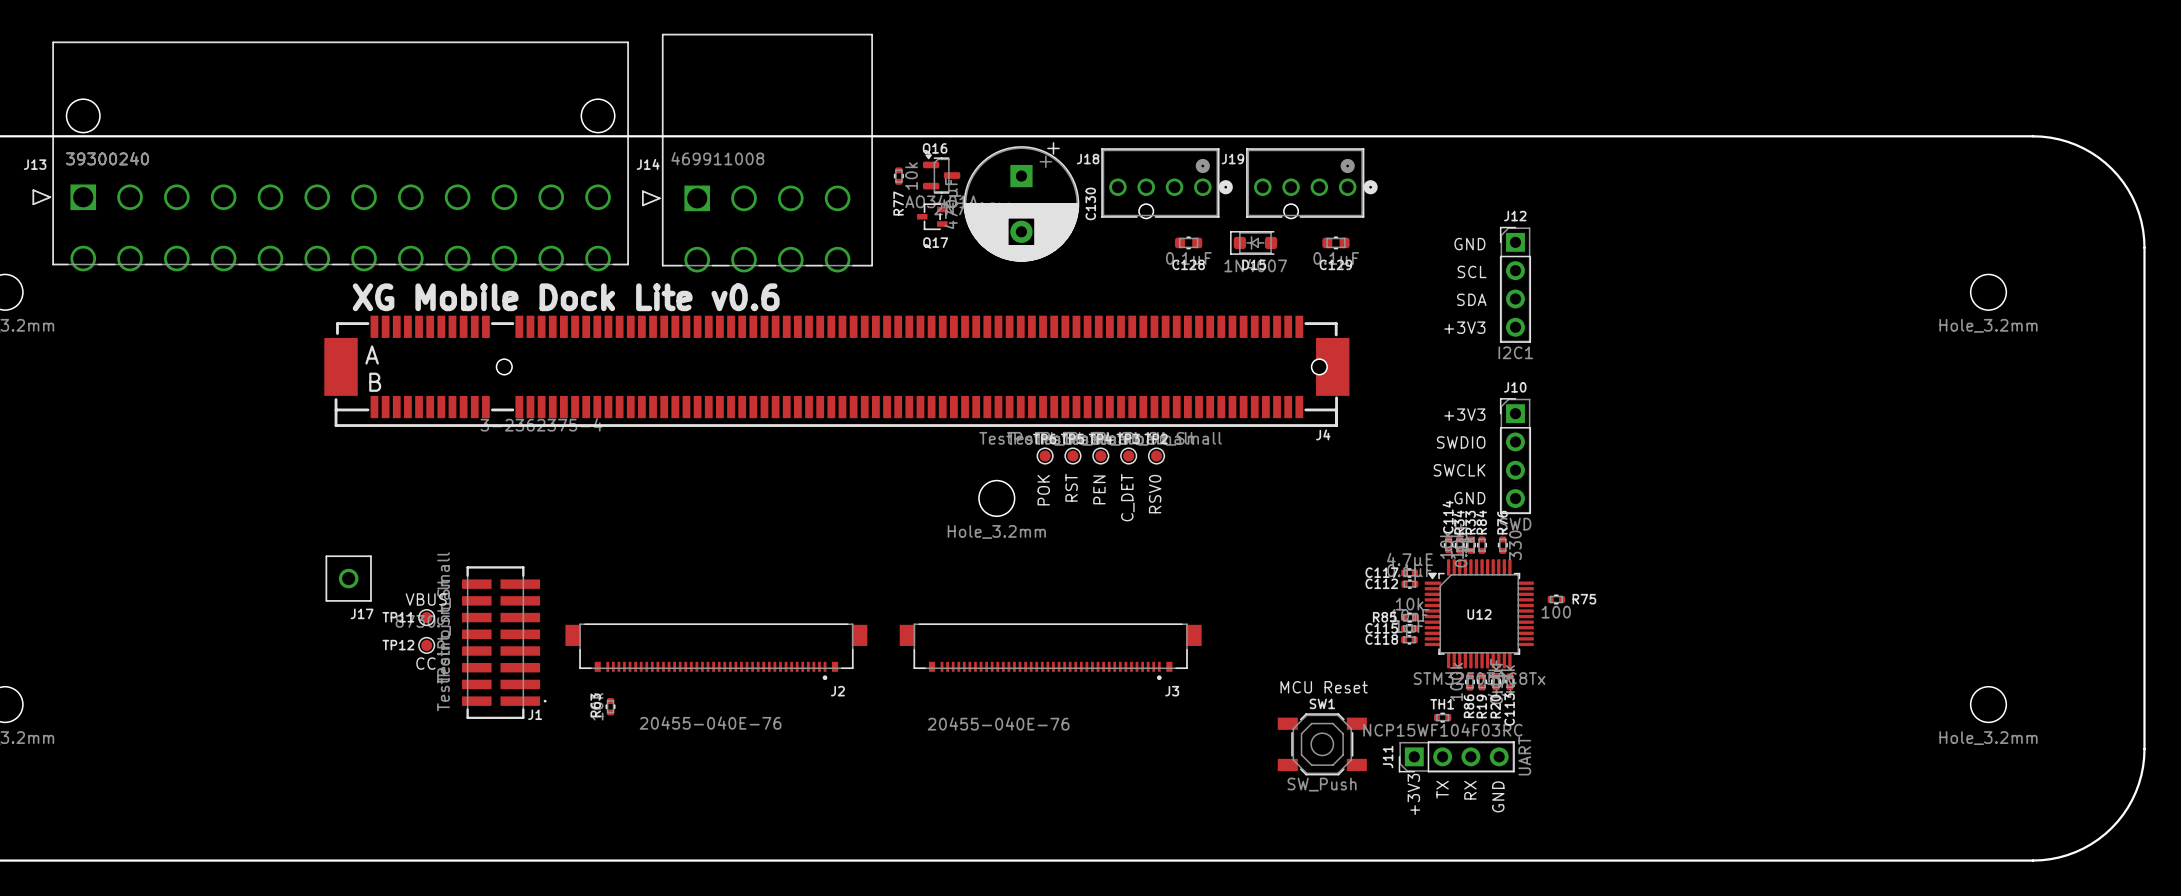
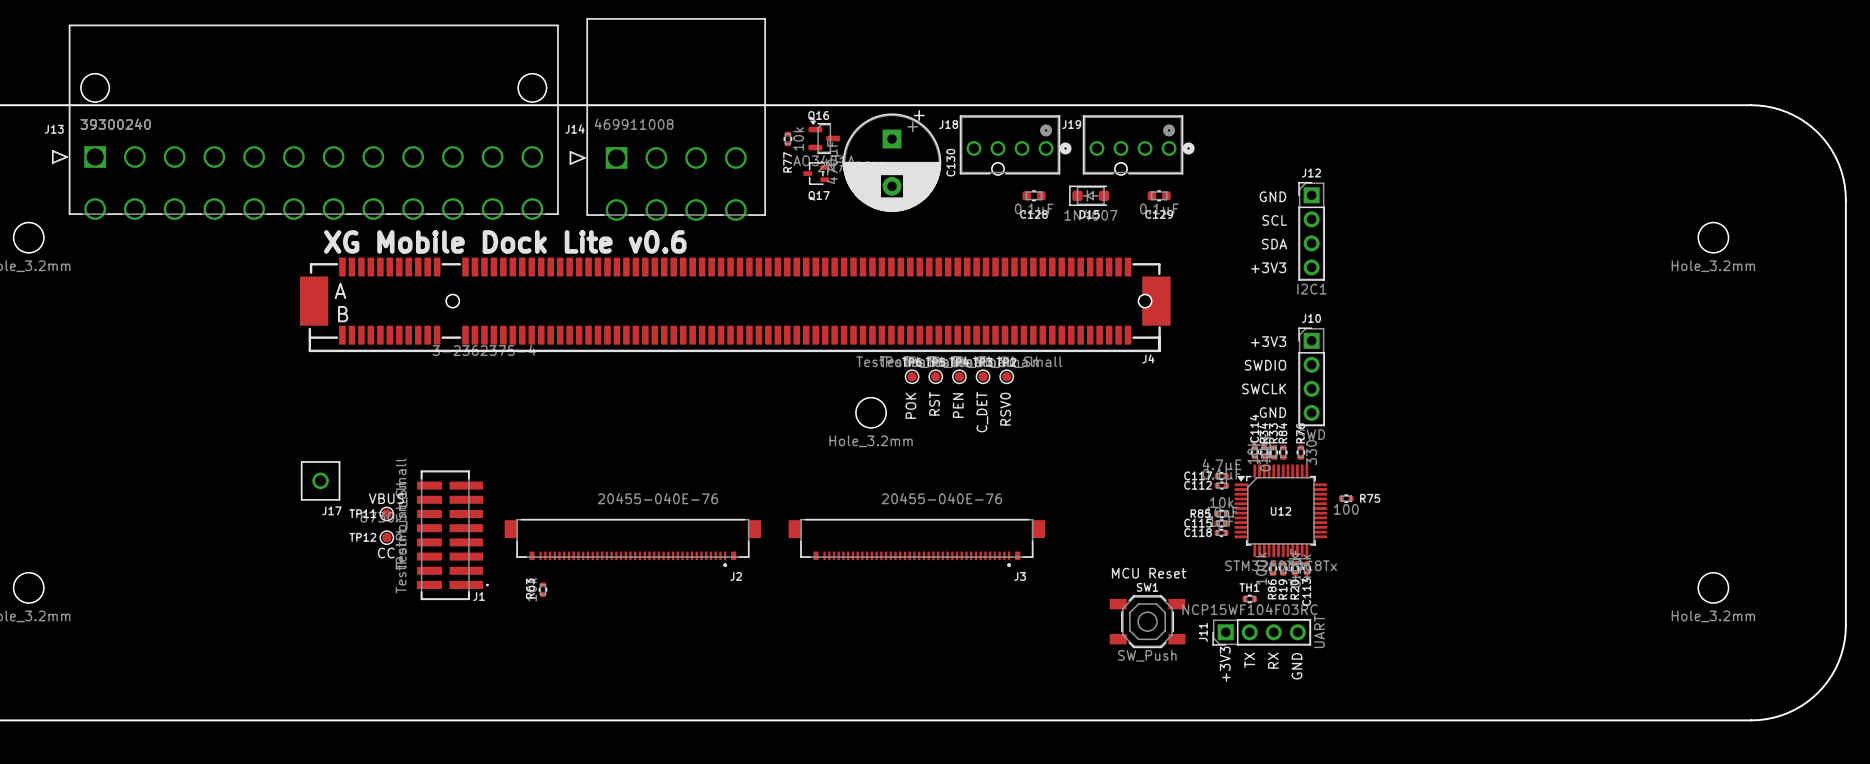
J2 value position: 20455-040E-76 (710, 723) -> 20455-040E-76 (657, 498)
J3 value position: 20455-040E-76 (998, 723) -> 20455-040E-76 (941, 498)

